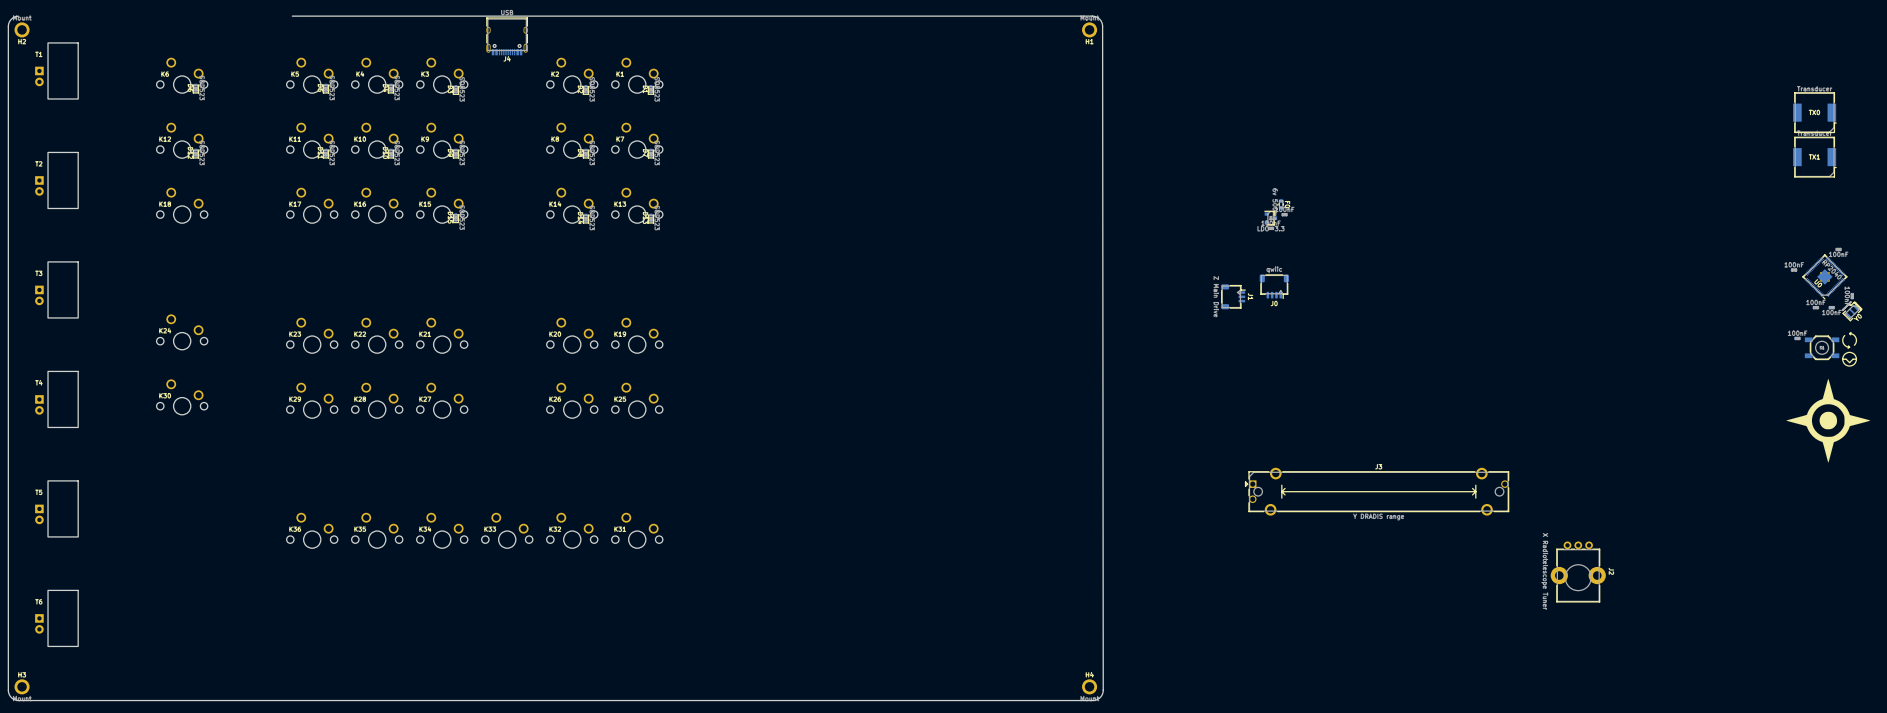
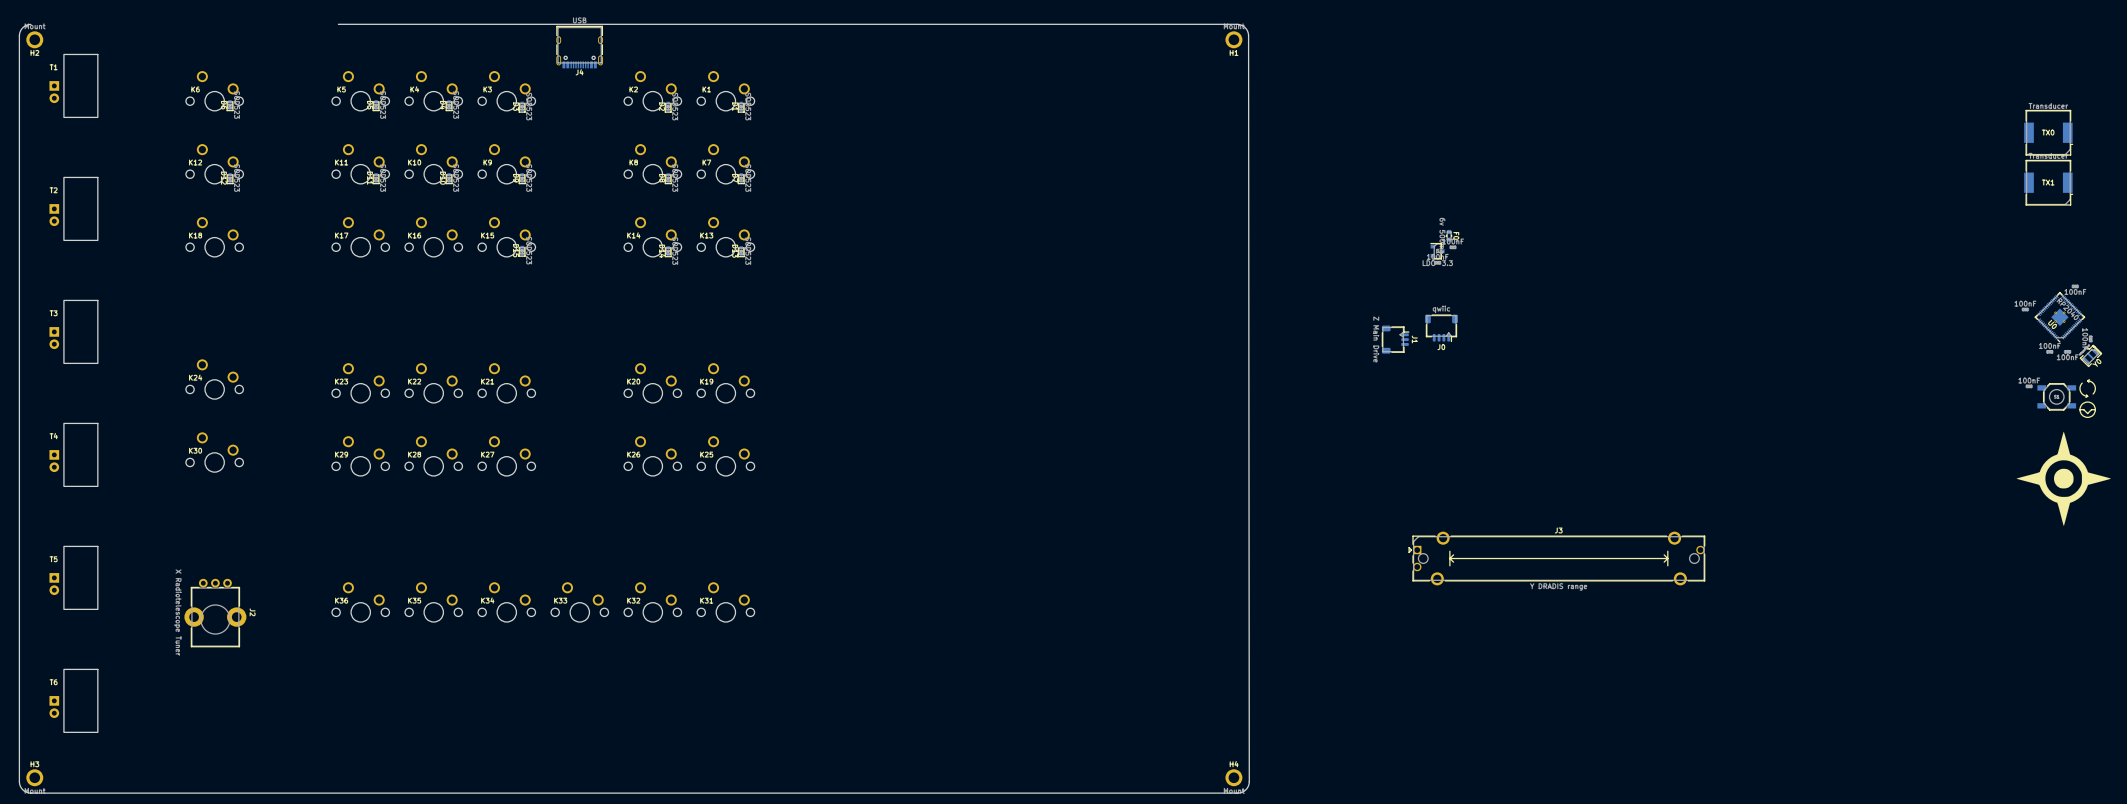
part position: (1578, 571) -> (215, 612)

